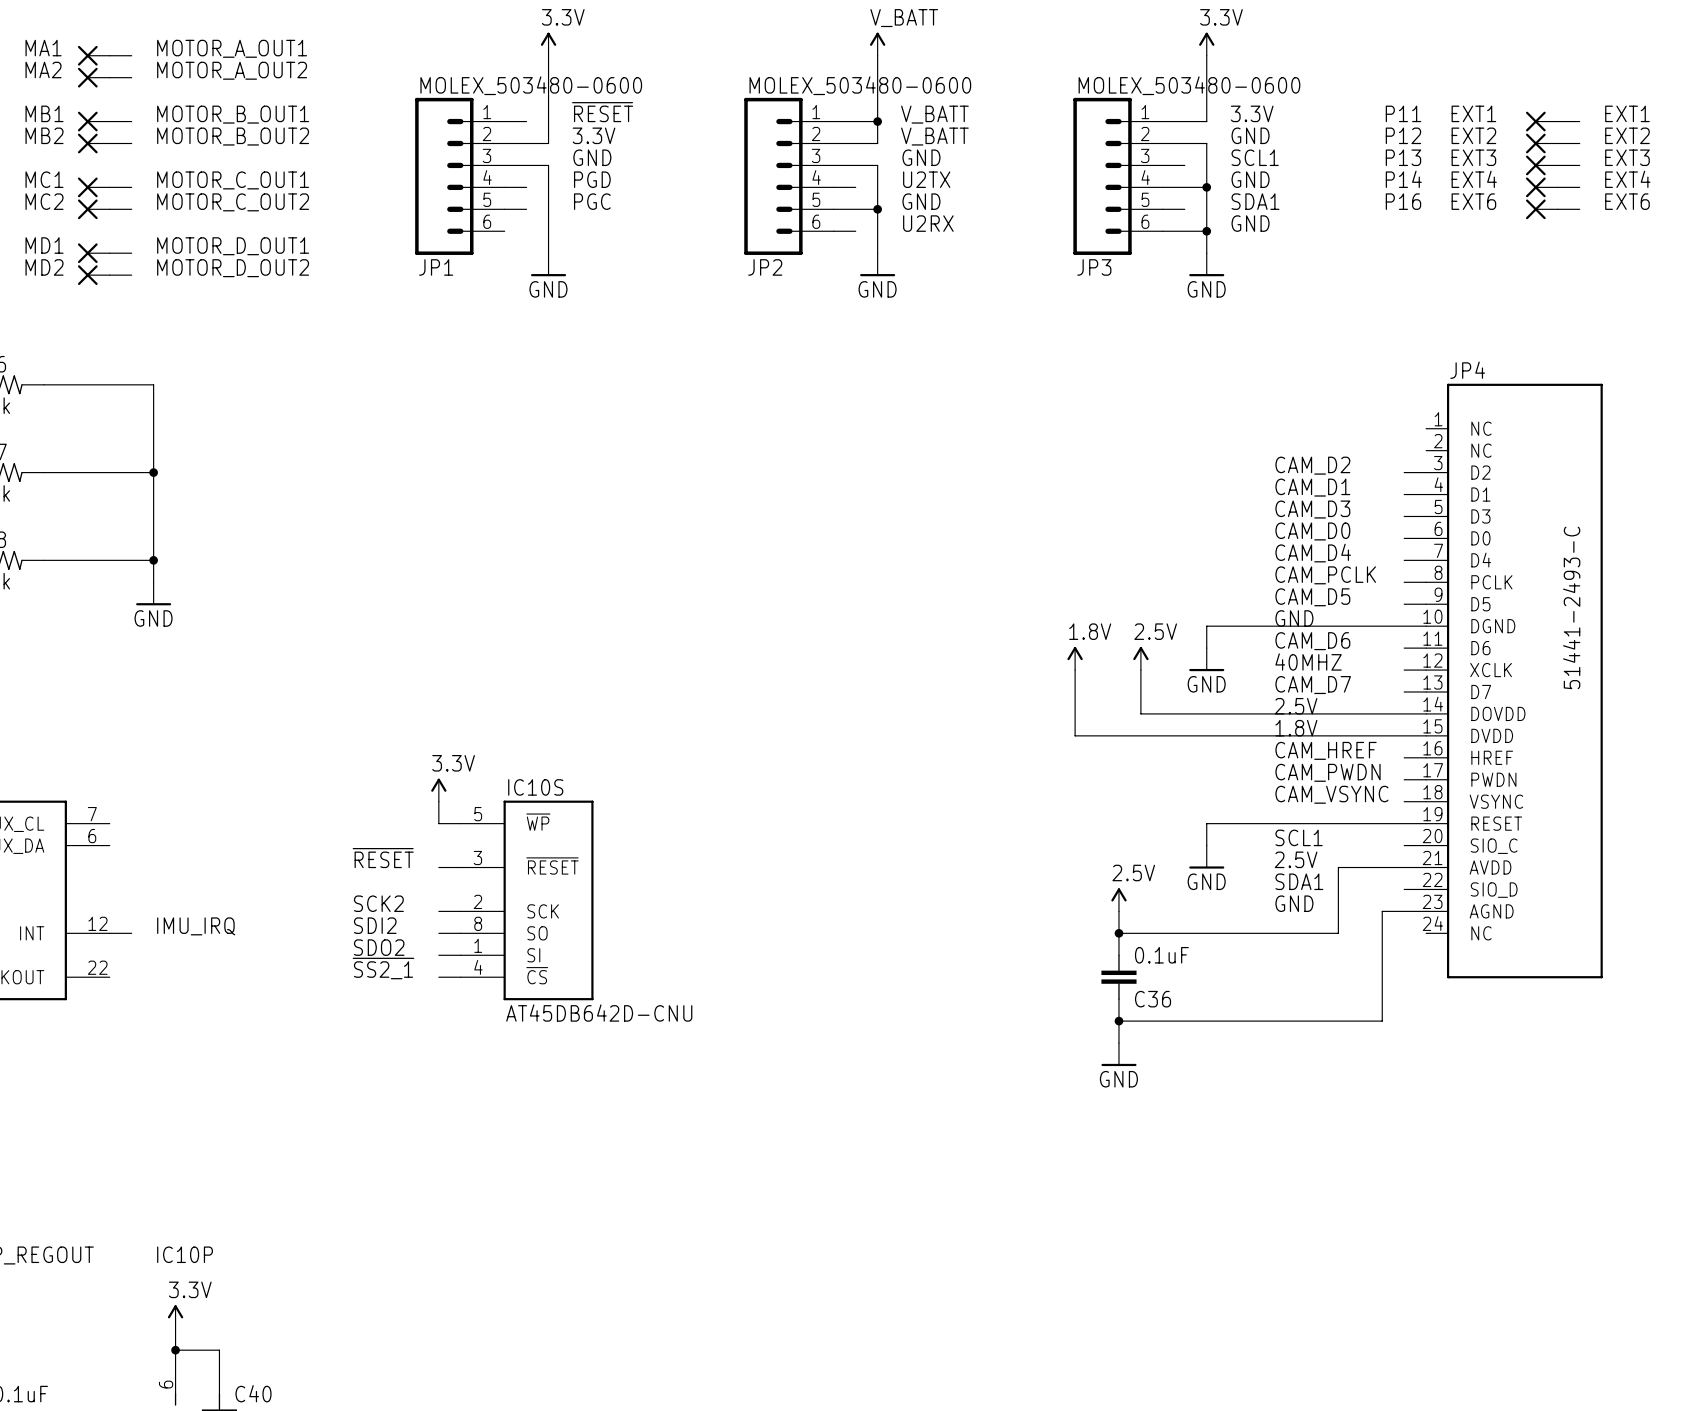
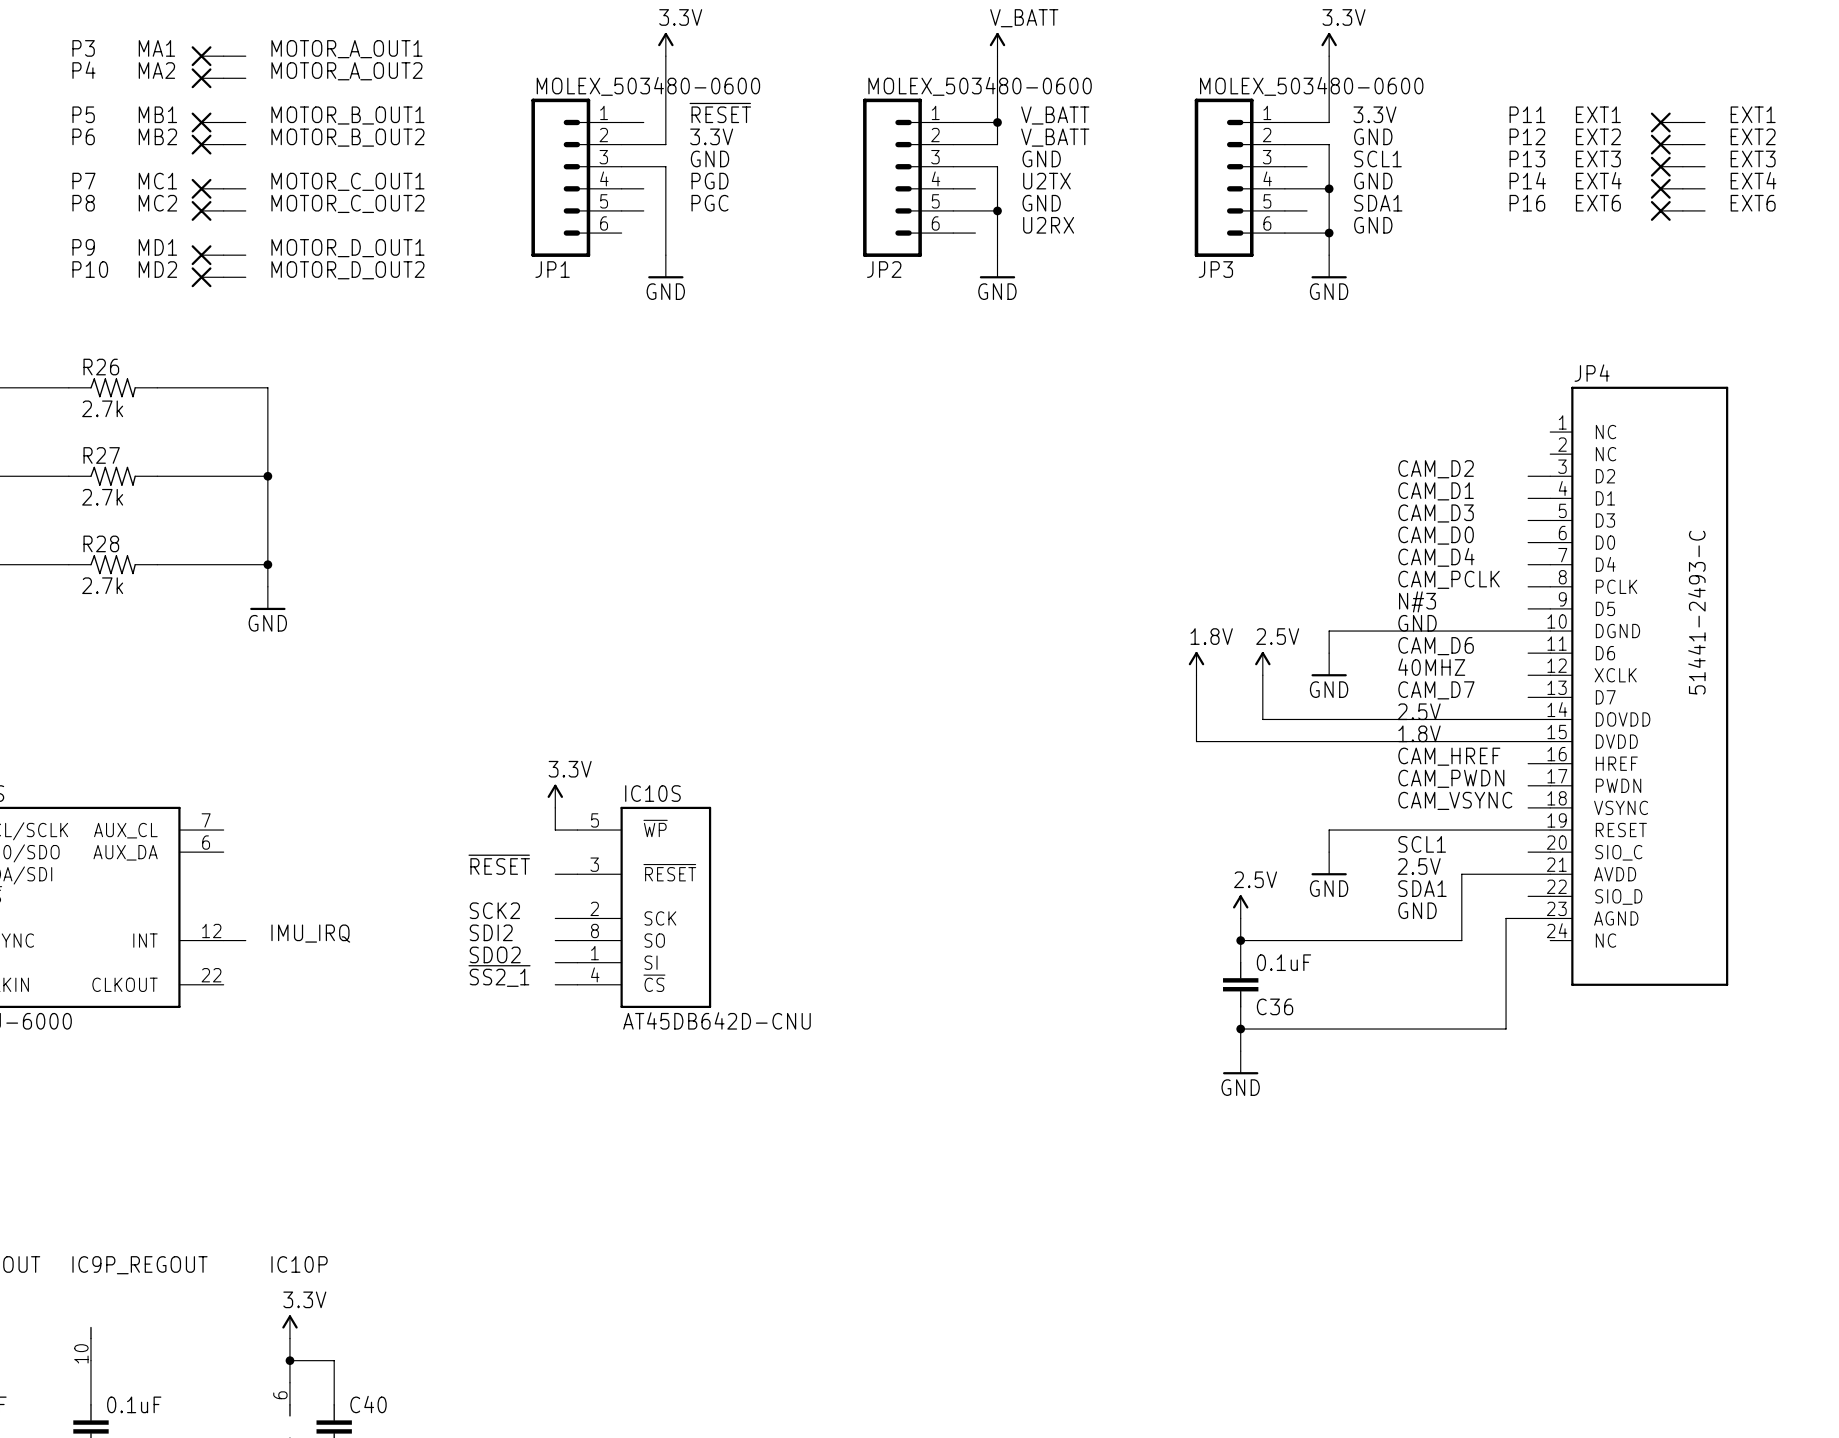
label: CAM_D5 (1312, 597) -> N#3 (1417, 601)

